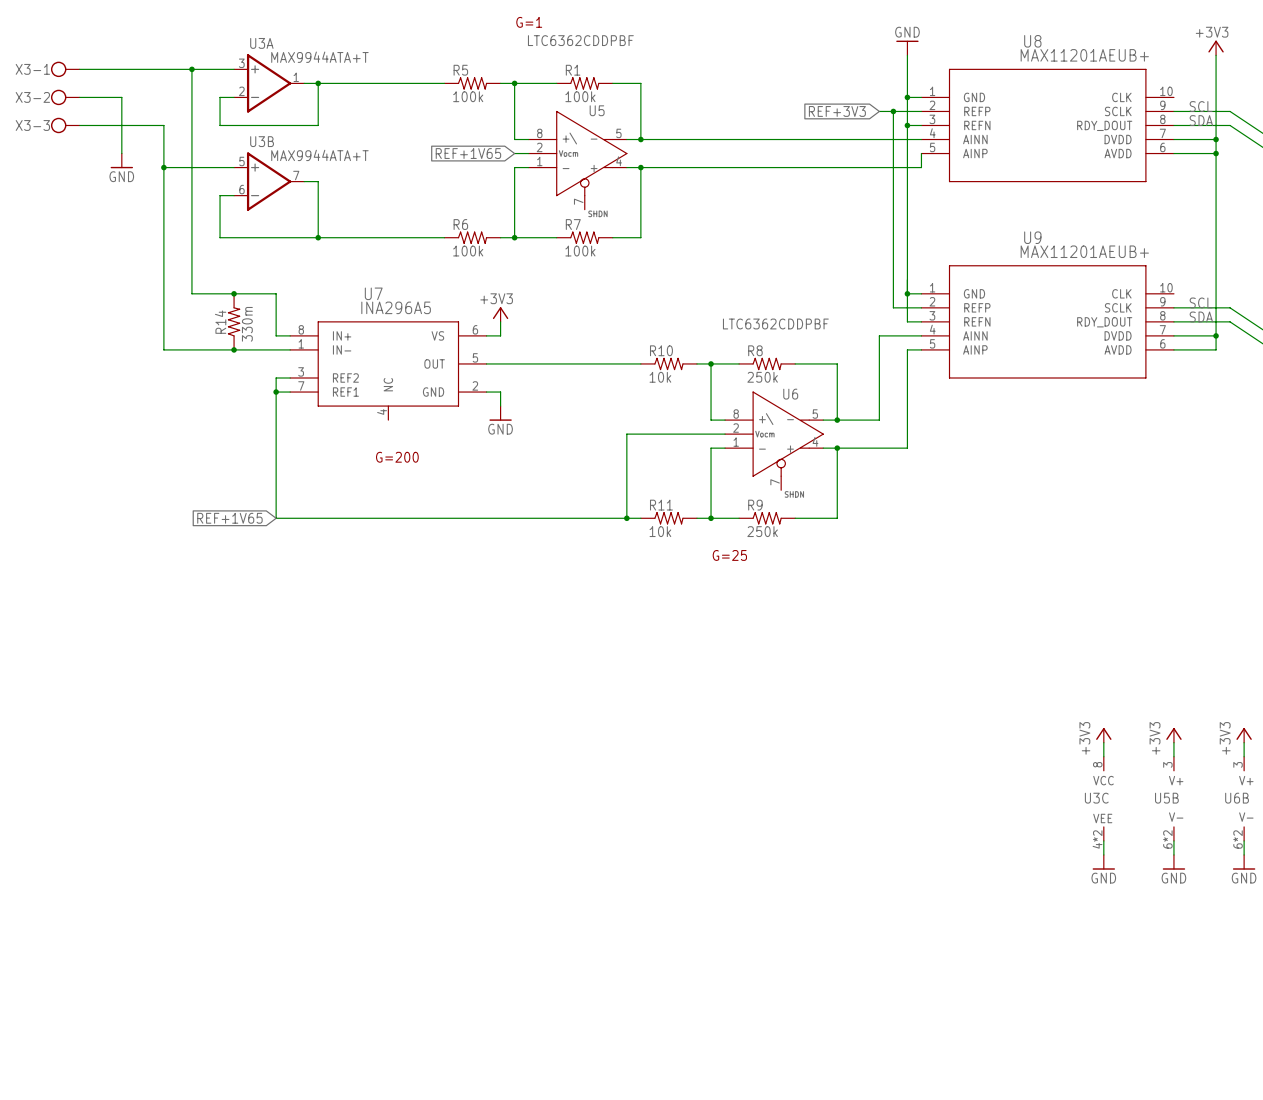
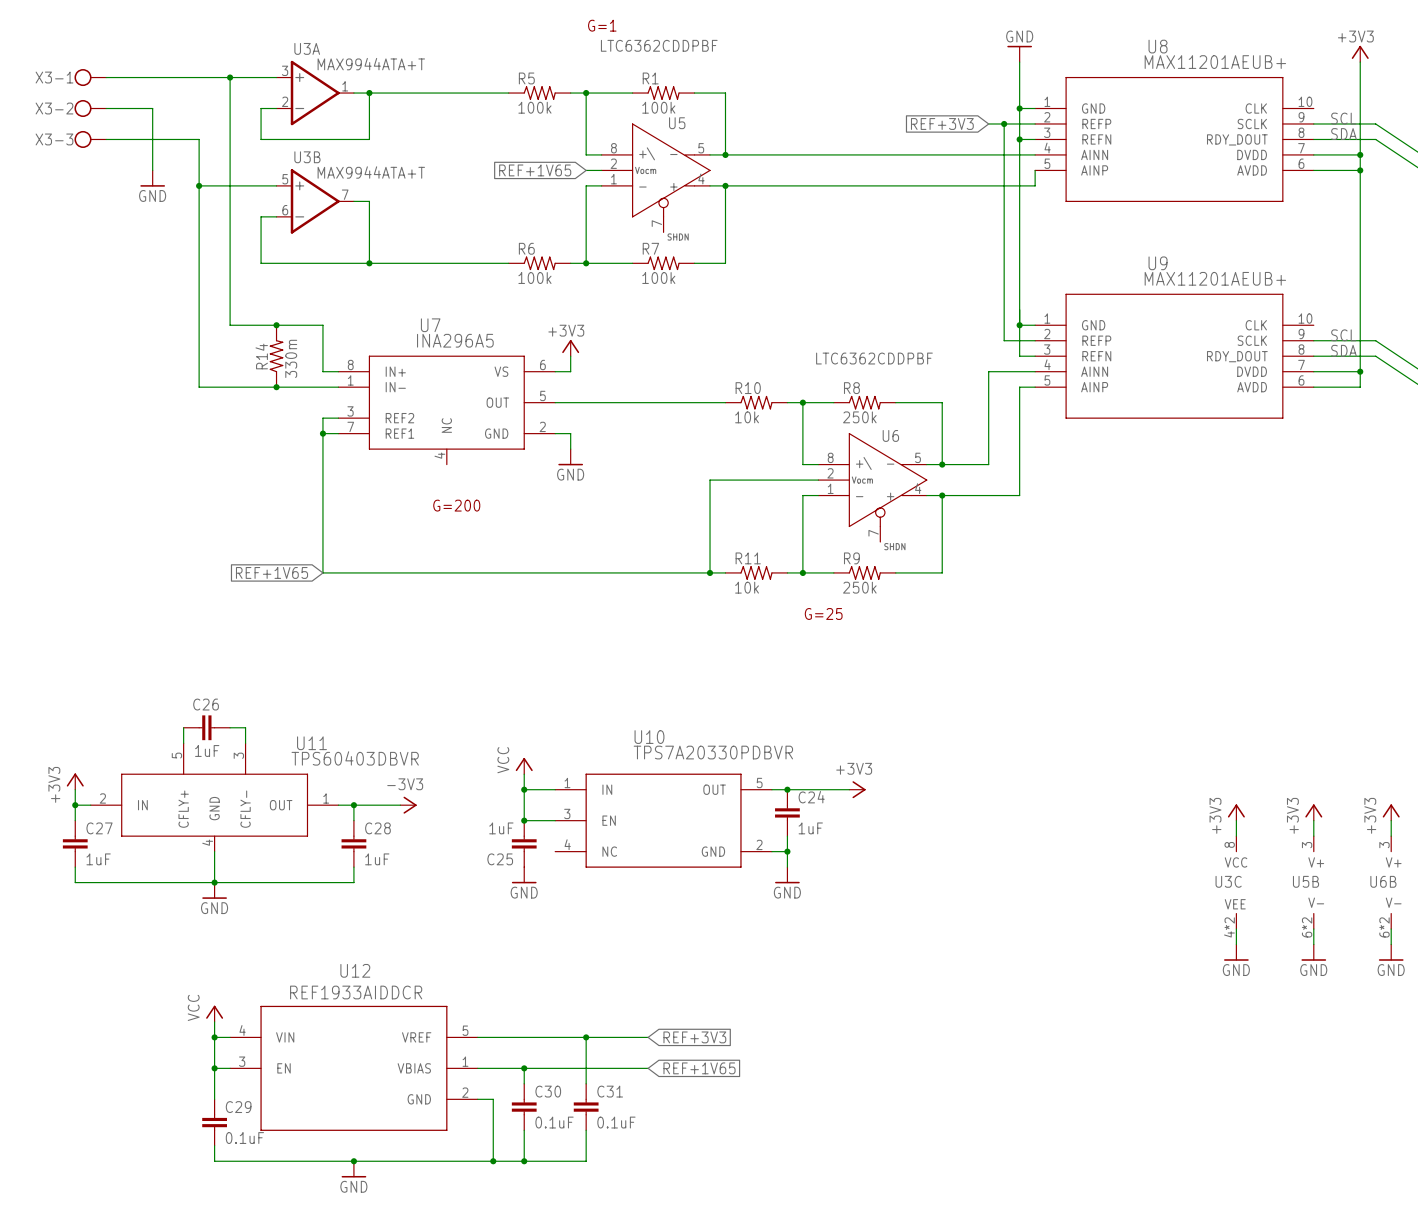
wire: none -> (183, 727) (183, 743)
C26: none -> 1uF (206, 727)
wire: none -> (230, 727) (245, 727) (245, 743)
power symbol: none -> VCC (524, 766)
wire: none -> (524, 774) (524, 820) (555, 820)
power symbol: none -> +3V3 (75, 781)
wire: none -> (75, 789) (75, 820)
wire: none -> (524, 789) (555, 789)
junction: none -> (524, 789)
wire: none -> (771, 789) (849, 789)
junction: none -> (787, 789)
power symbol: none -> +3V3 (857, 789)
U11: none -> TPS60403DBVR (214, 797)
wire: none -> (75, 805) (90, 805)
junction: none -> (75, 805)
wire: none -> (338, 805) (400, 805)
wire: none -> (353, 805) (353, 820)
junction: none -> (353, 805)
power symbol: none -> -3V3 (408, 805)
C24: none -> 1uF (787, 812)
junction: none -> (524, 820)
U10: none -> TPS7A20330PDBVR (663, 820)
wire: none -> (787, 836) (787, 867)
C27: none -> 1uF (75, 843)
C28: none -> 1uF (353, 843)
C25: none -> 1uF (524, 843)
wire: none -> (214, 851) (214, 882)
wire: none -> (771, 851) (787, 851)
junction: none -> (787, 851)
wire: none -> (75, 867) (75, 882) (353, 882) (353, 867)
power symbol: none -> GND (524, 875)
power symbol: none -> GND (787, 875)
junction: none -> (214, 882)
power symbol: none -> GND (214, 890)
power symbol: none -> VCC (214, 1013)
wire: none -> (214, 1021) (214, 1099)
wire: none -> (214, 1037) (230, 1037)
junction: none -> (214, 1037)
wire: none -> (477, 1037) (648, 1037)
wire: none -> (586, 1037) (586, 1083)
junction: none -> (586, 1037)
global label: none -> REF+3V3 (694, 1037)
wire: none -> (214, 1068) (230, 1068)
junction: none -> (214, 1068)
U12: none -> REF1933AIDDCR (353, 1068)
wire: none -> (477, 1068) (648, 1068)
wire: none -> (524, 1068) (524, 1083)
junction: none -> (524, 1068)
global label: none -> REF+1V65 (699, 1068)
wire: none -> (477, 1099) (493, 1099) (493, 1161)
C30: none -> 0.1uF (524, 1107)
C31: none -> 0.1uF (586, 1107)
C29: none -> 0.1uF (214, 1122)
wire: none -> (524, 1130) (524, 1161)
wire: none -> (586, 1130) (586, 1161) (214, 1161) (214, 1145)
junction: none -> (353, 1161)
junction: none -> (493, 1161)
junction: none -> (524, 1161)
power symbol: none -> GND (353, 1169)

